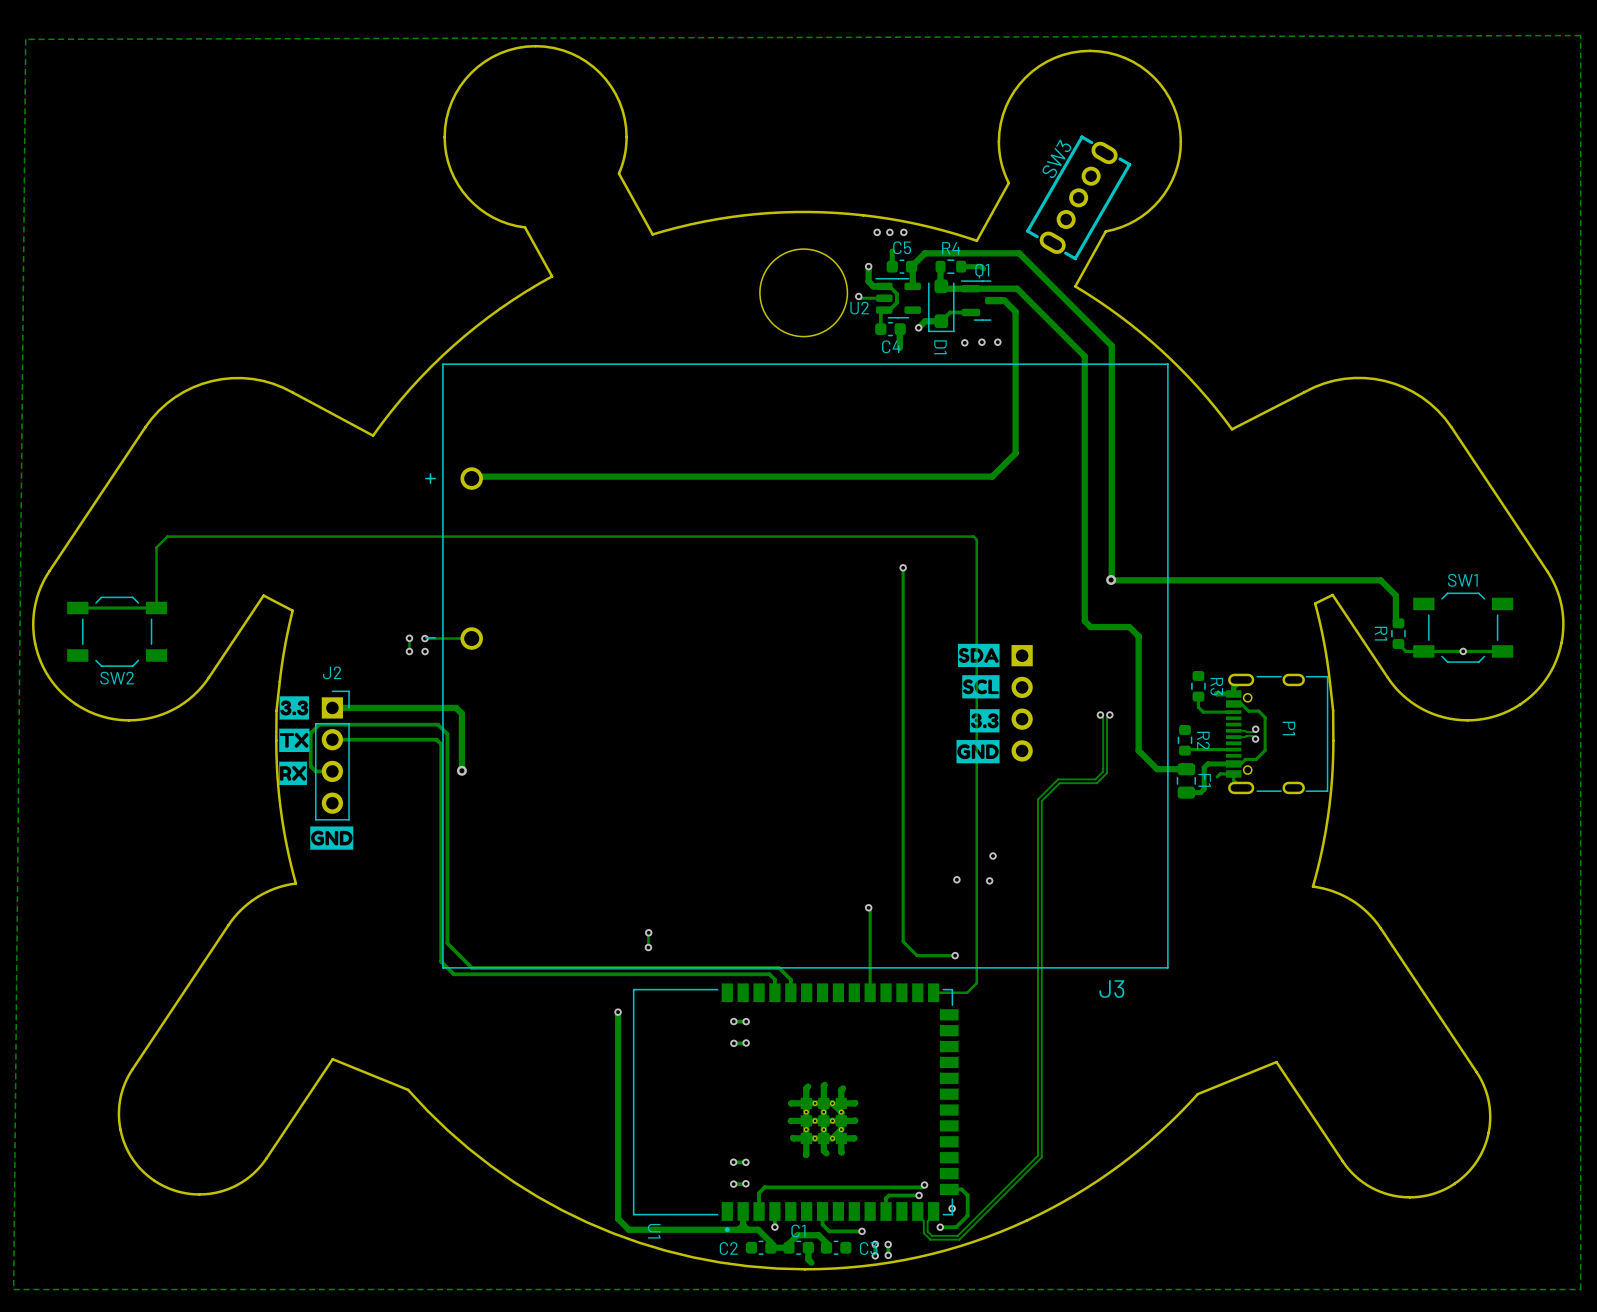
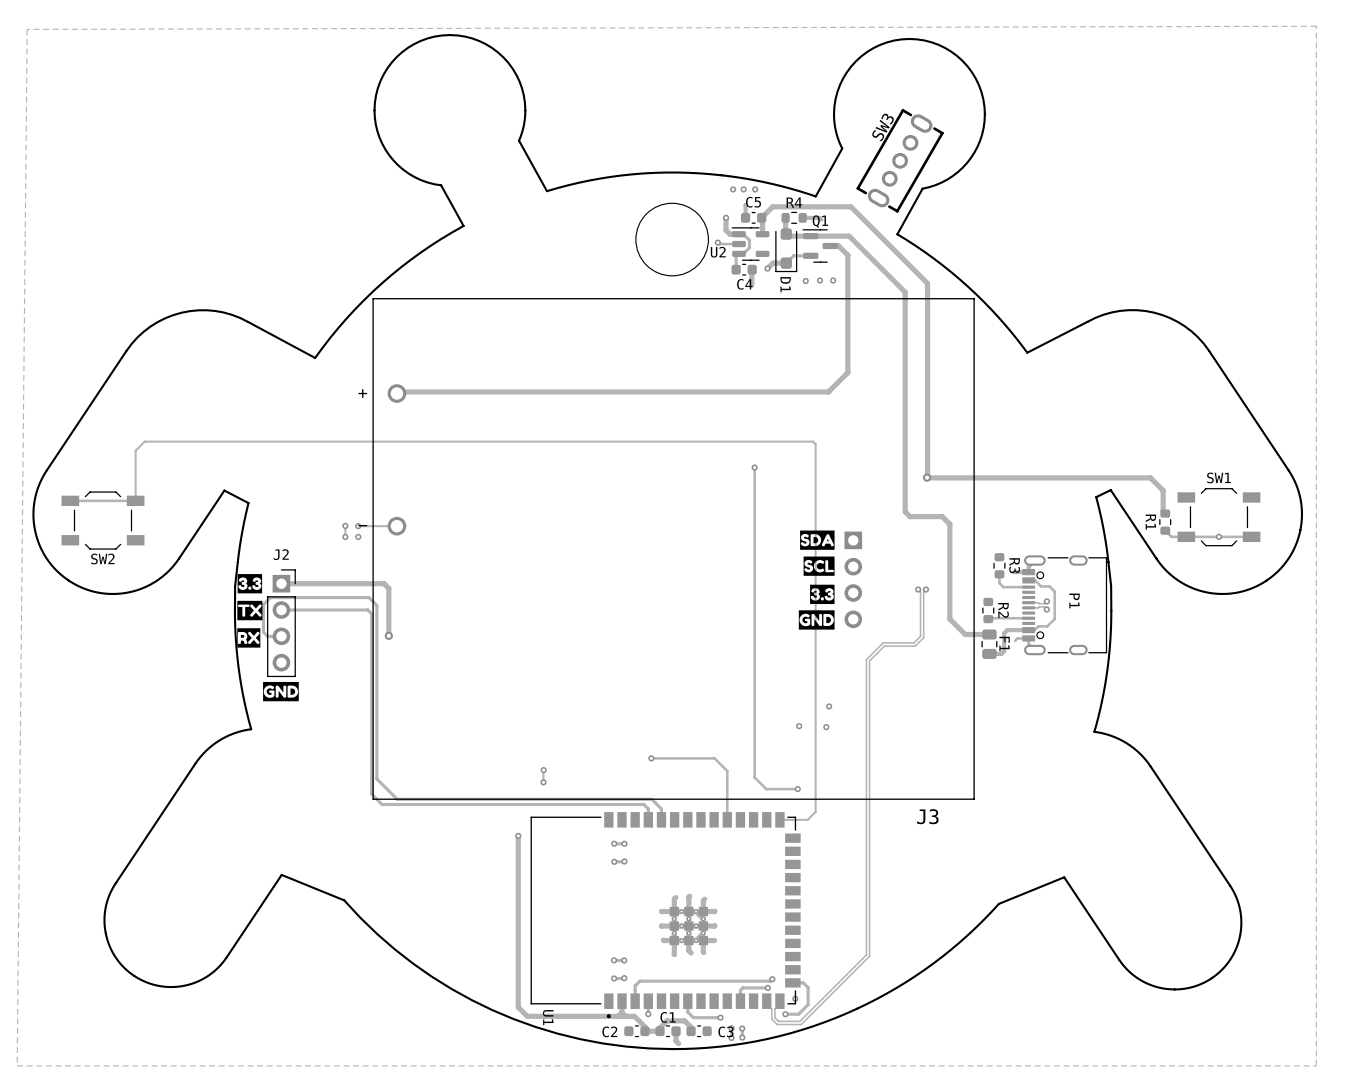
track: (868, 907) (870, 933) -> (651, 758) (714, 758) (727, 771)
via: (868, 907) -> none
via: none -> (651, 758)

